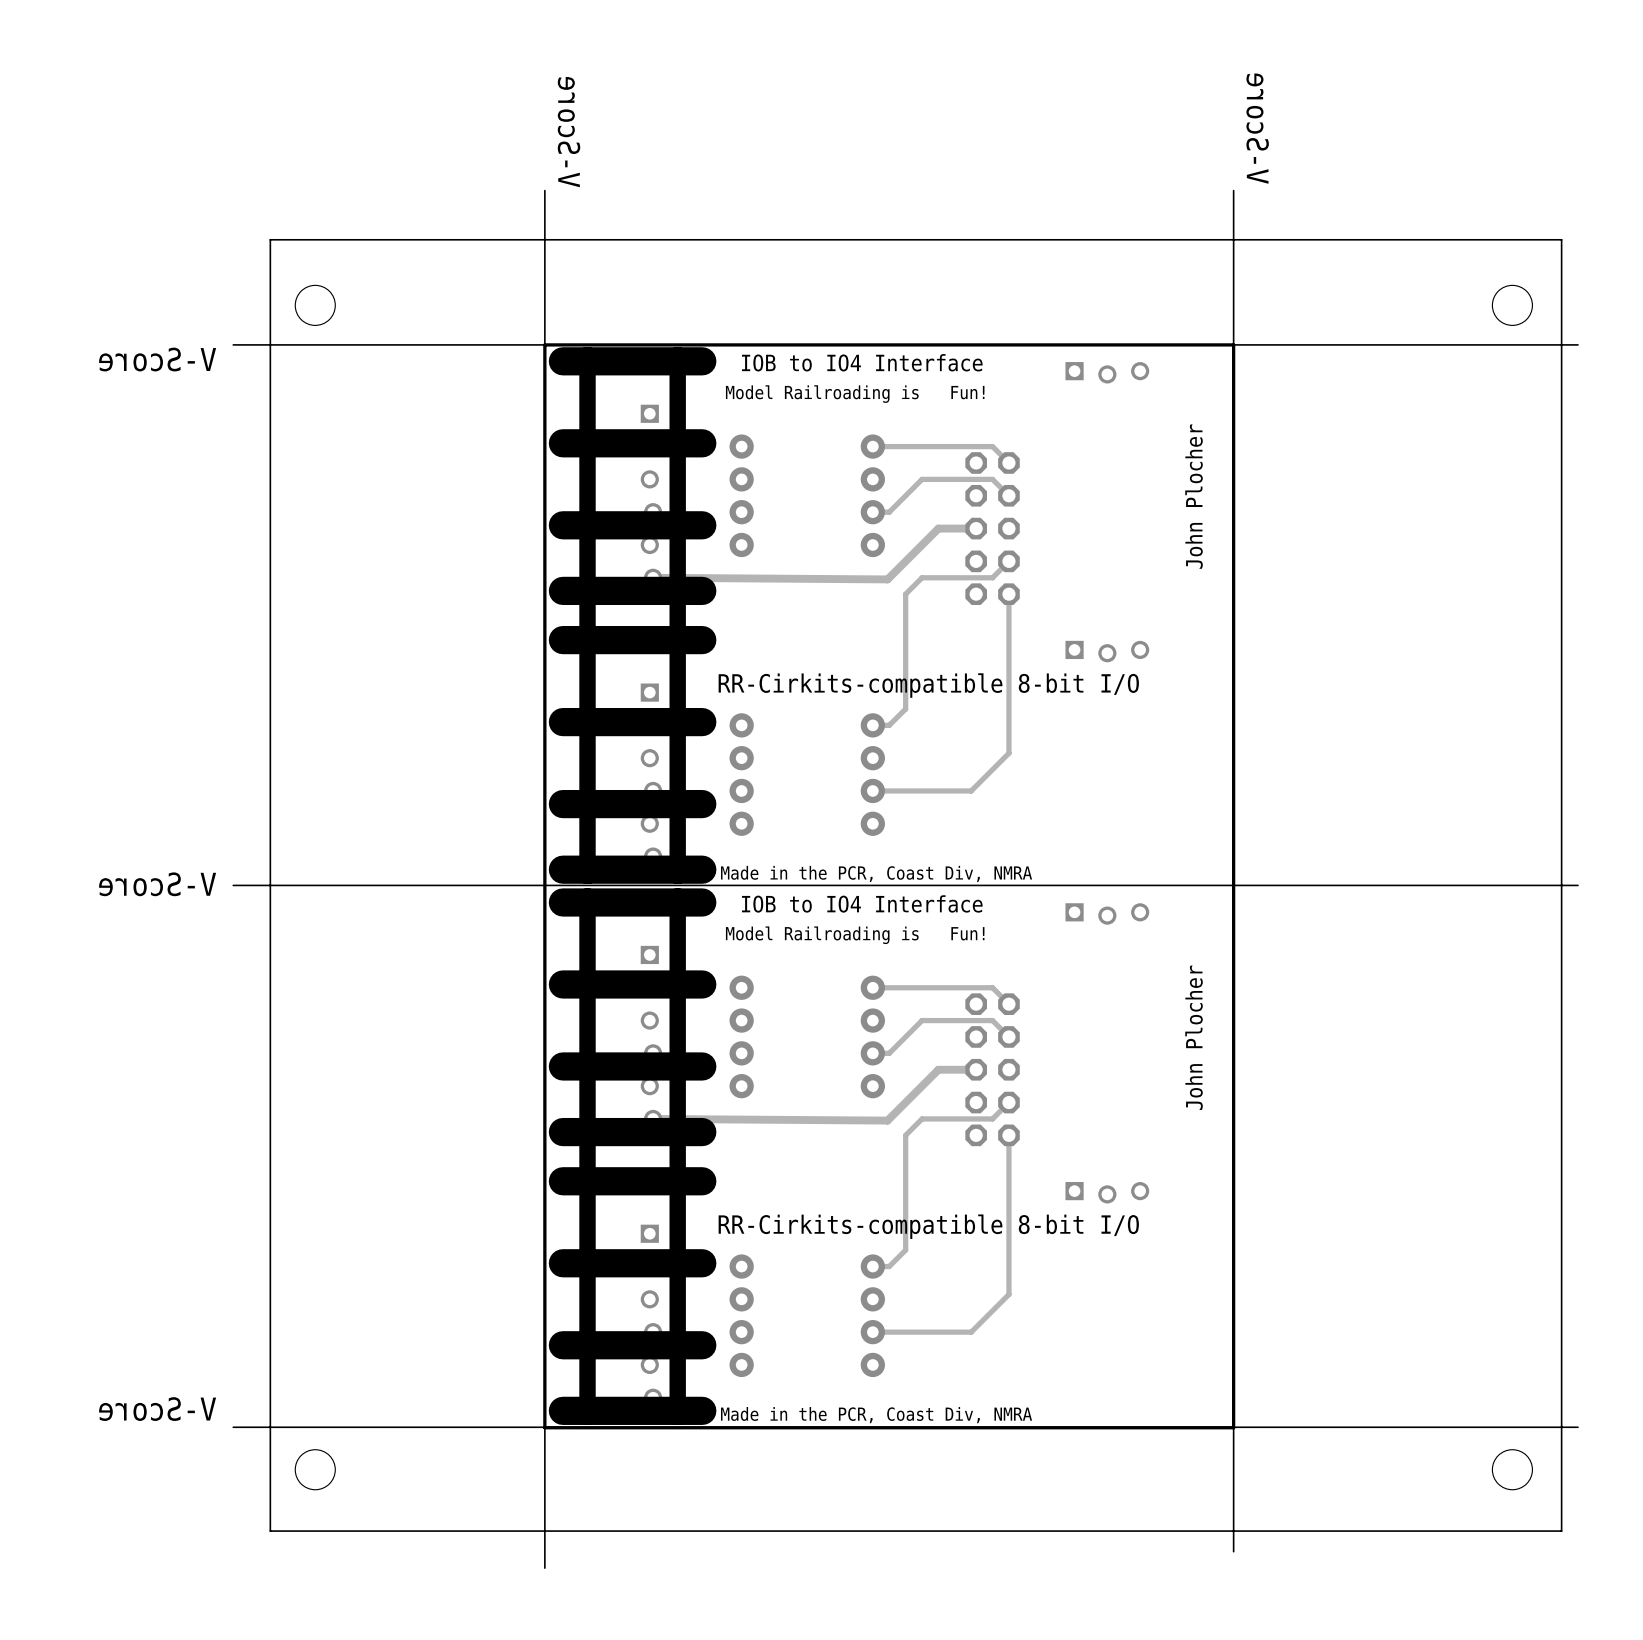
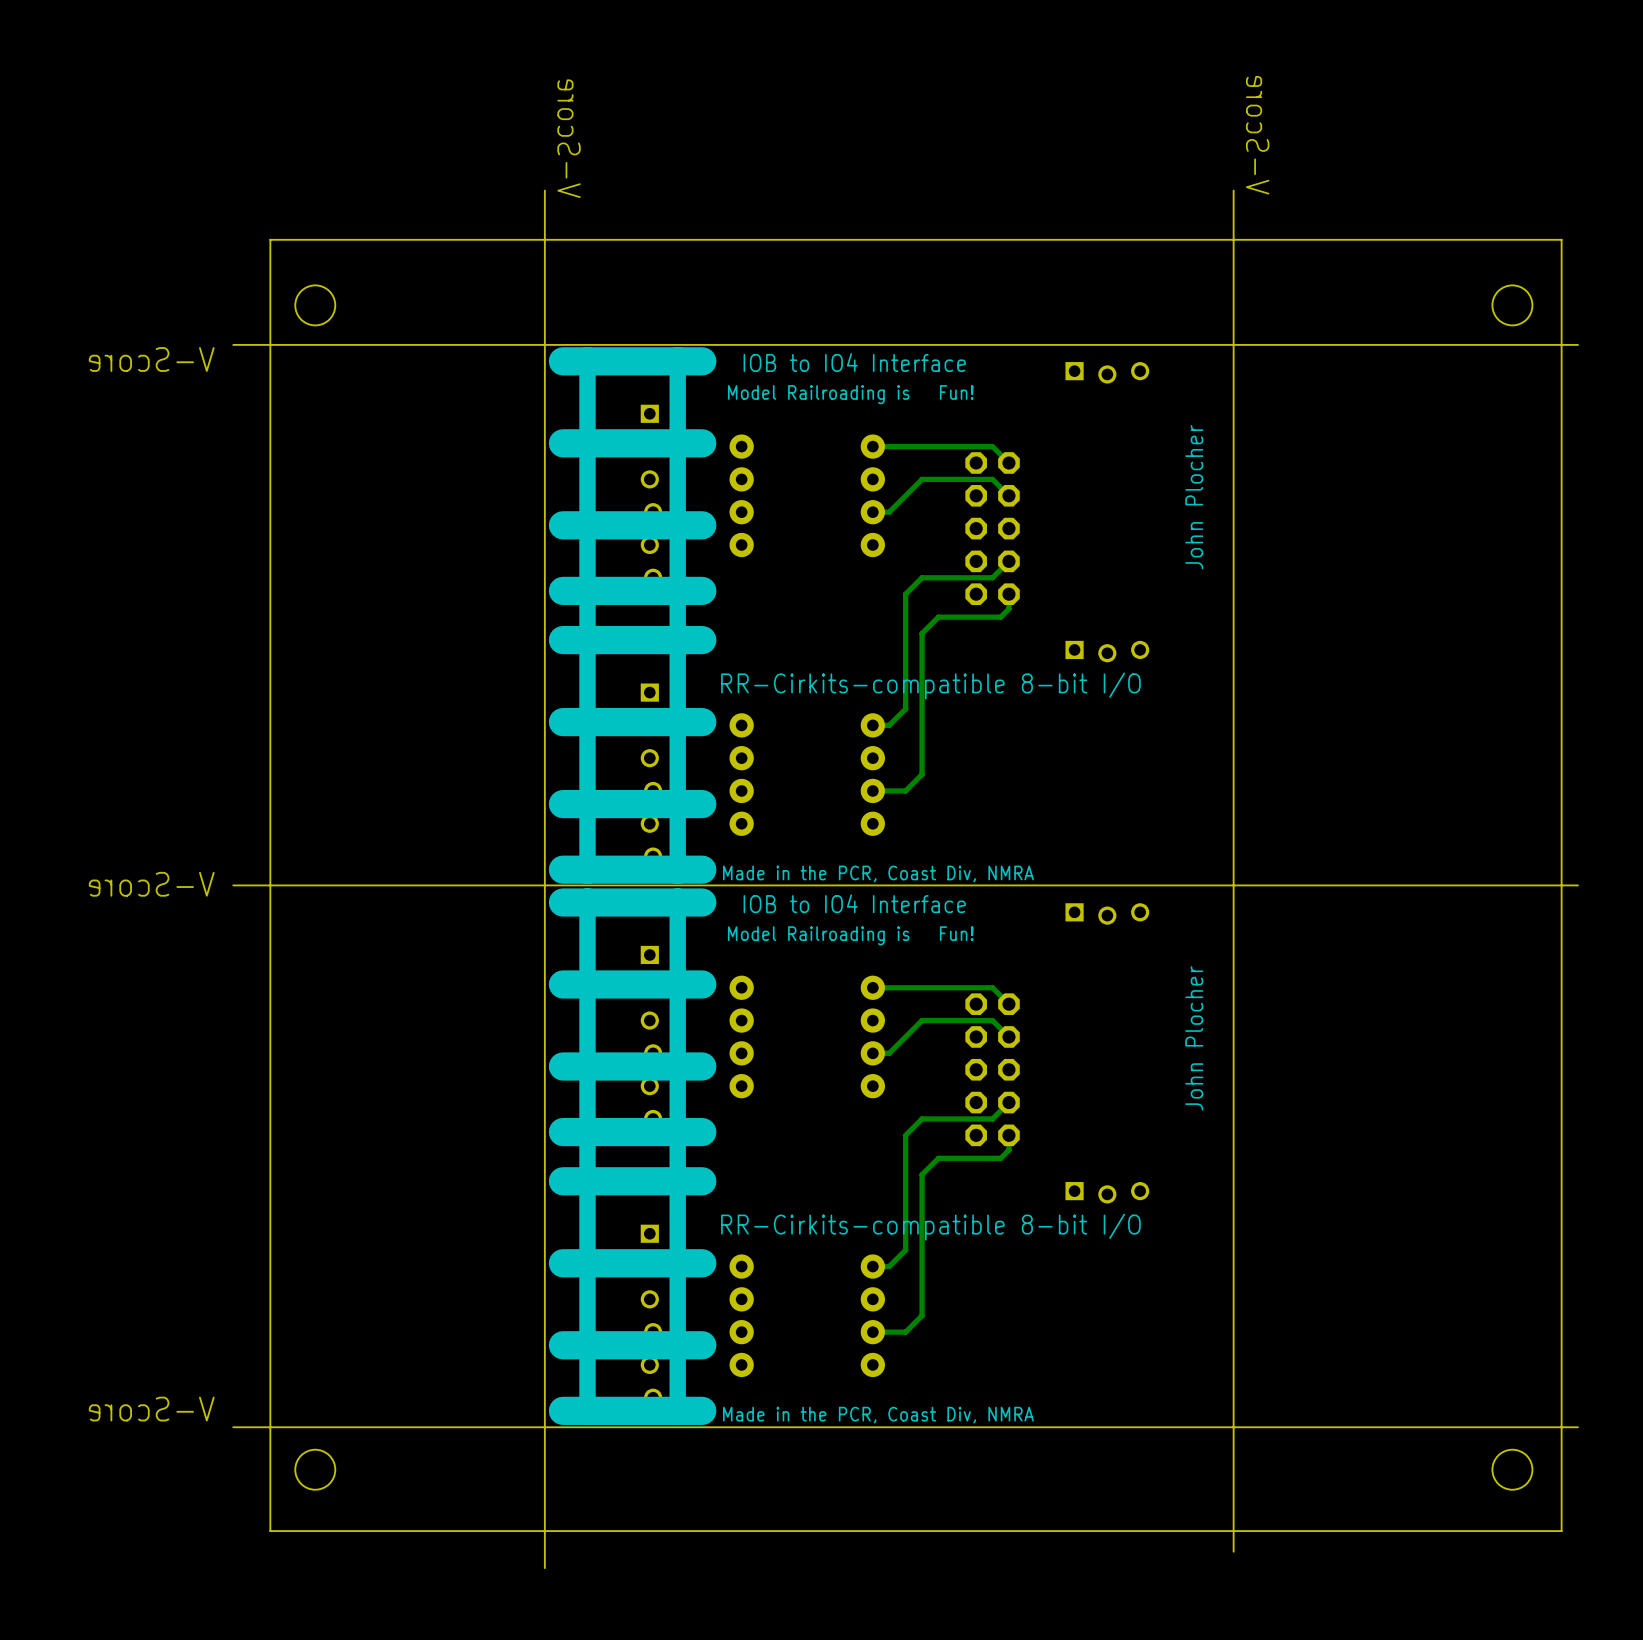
board edge: (1233, 344) (544, 344) (544, 1427) (1233, 1427) (1233, 344) -> none
track: (976, 528) (938, 528) (887, 579) (653, 577) -> none
track: (1008, 608) (1008, 753) (971, 790) (905, 790) -> (1008, 608) (1000, 617) (938, 617) (922, 633) (922, 774) (905, 790)
track: (976, 1069) (938, 1069) (887, 1120) (653, 1118) -> none
track: (1008, 1150) (1008, 1294) (971, 1332) (905, 1332) -> (1008, 1150) (1000, 1158) (938, 1158) (922, 1174) (922, 1315) (905, 1332)

